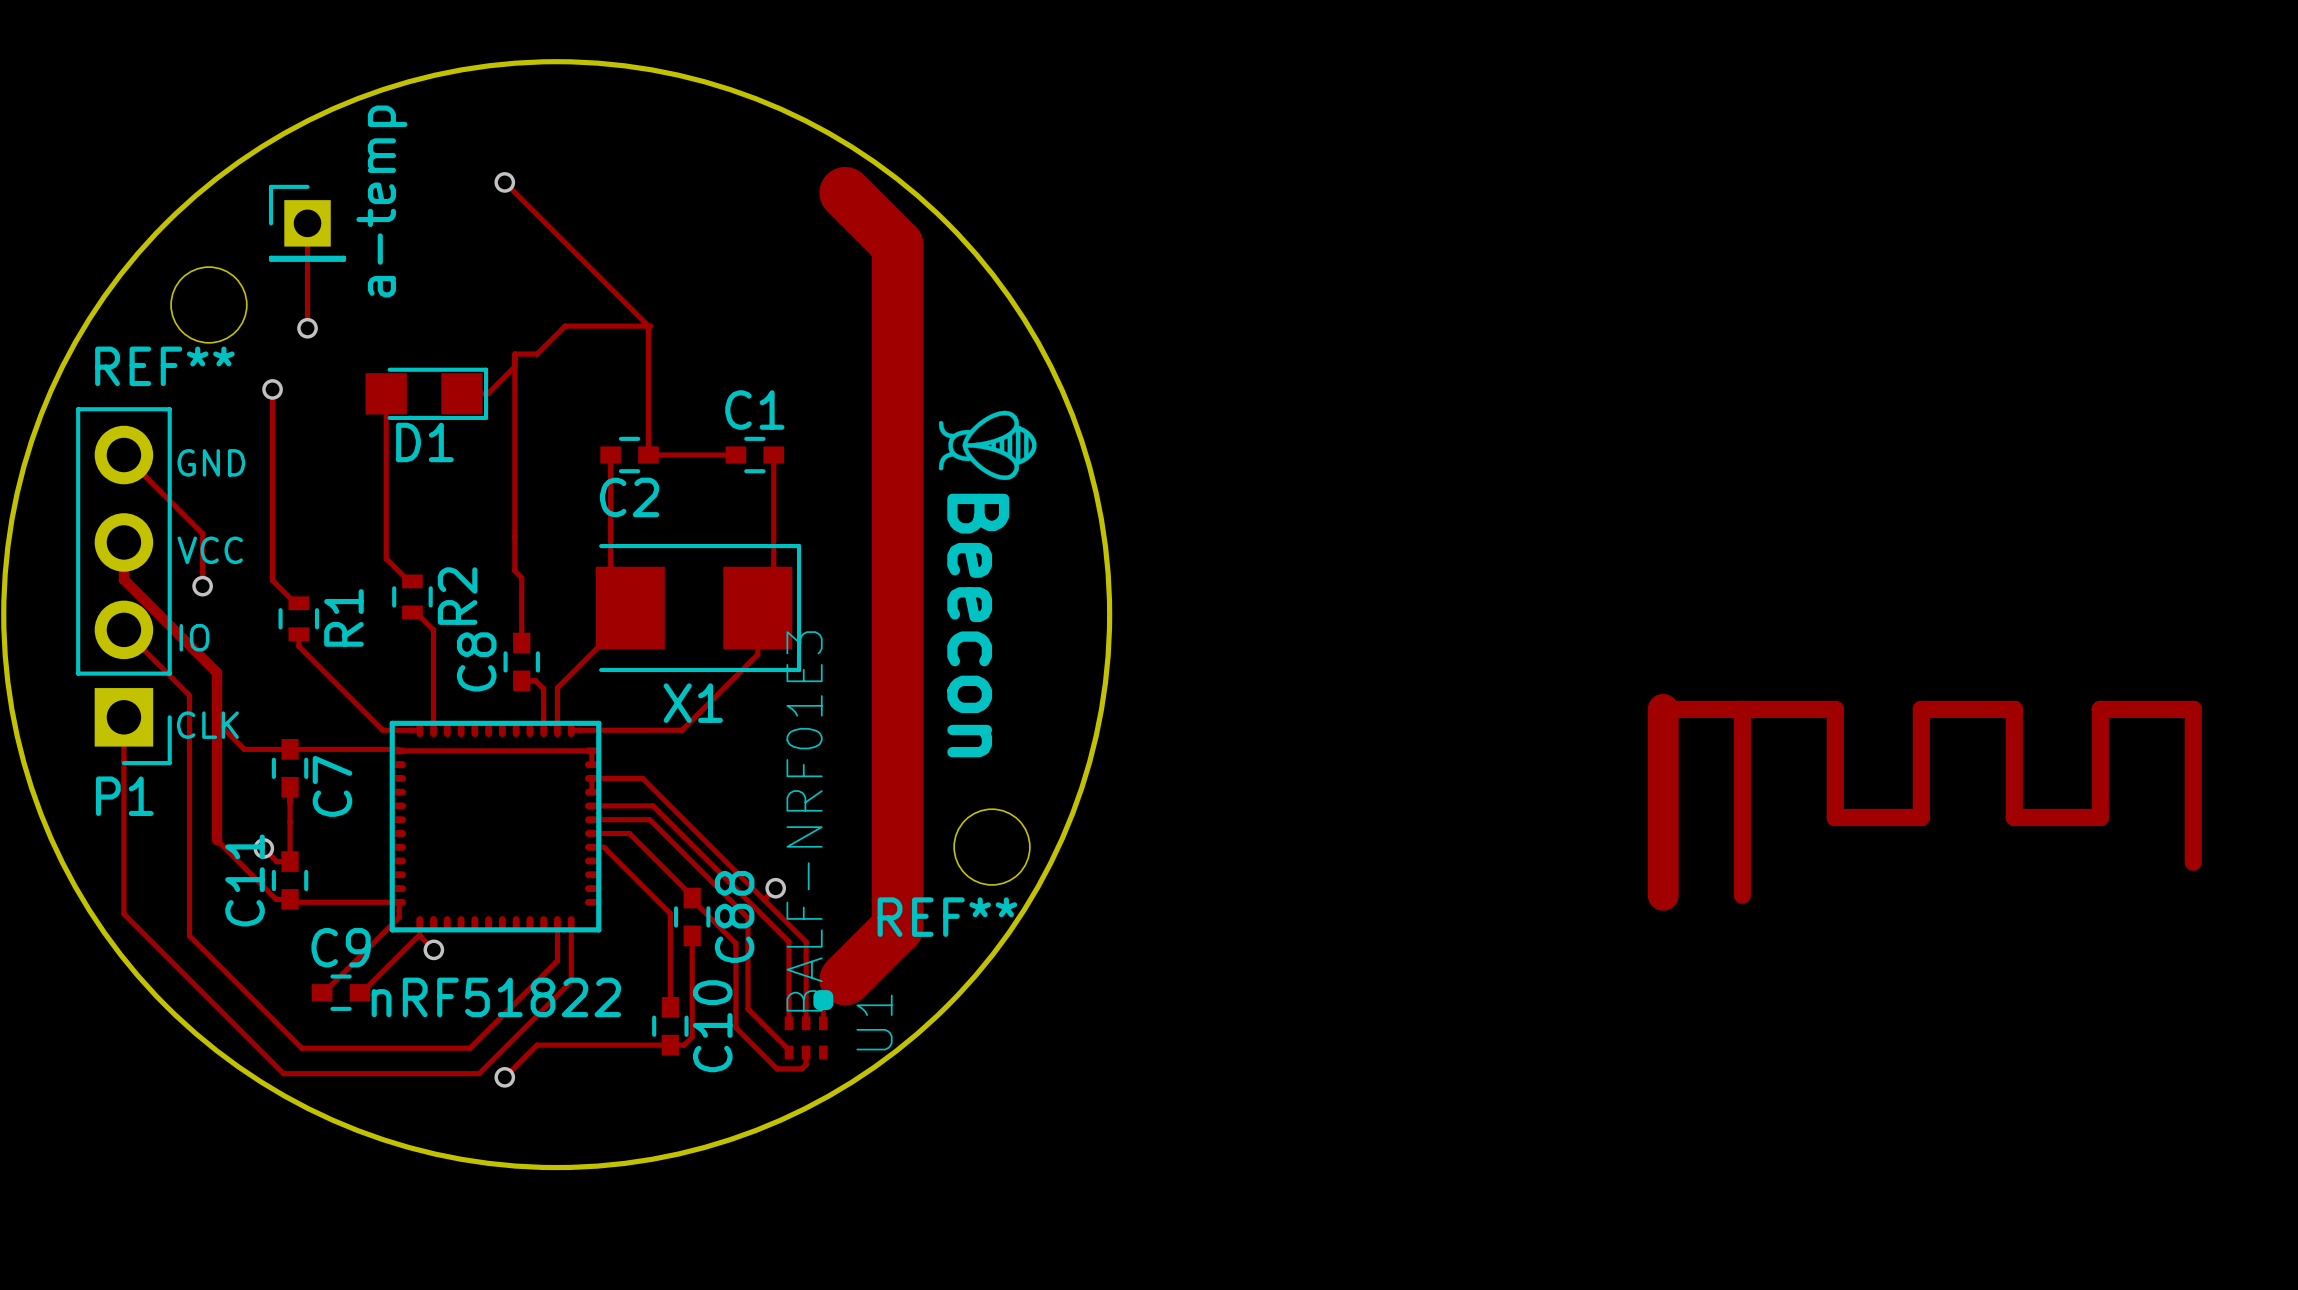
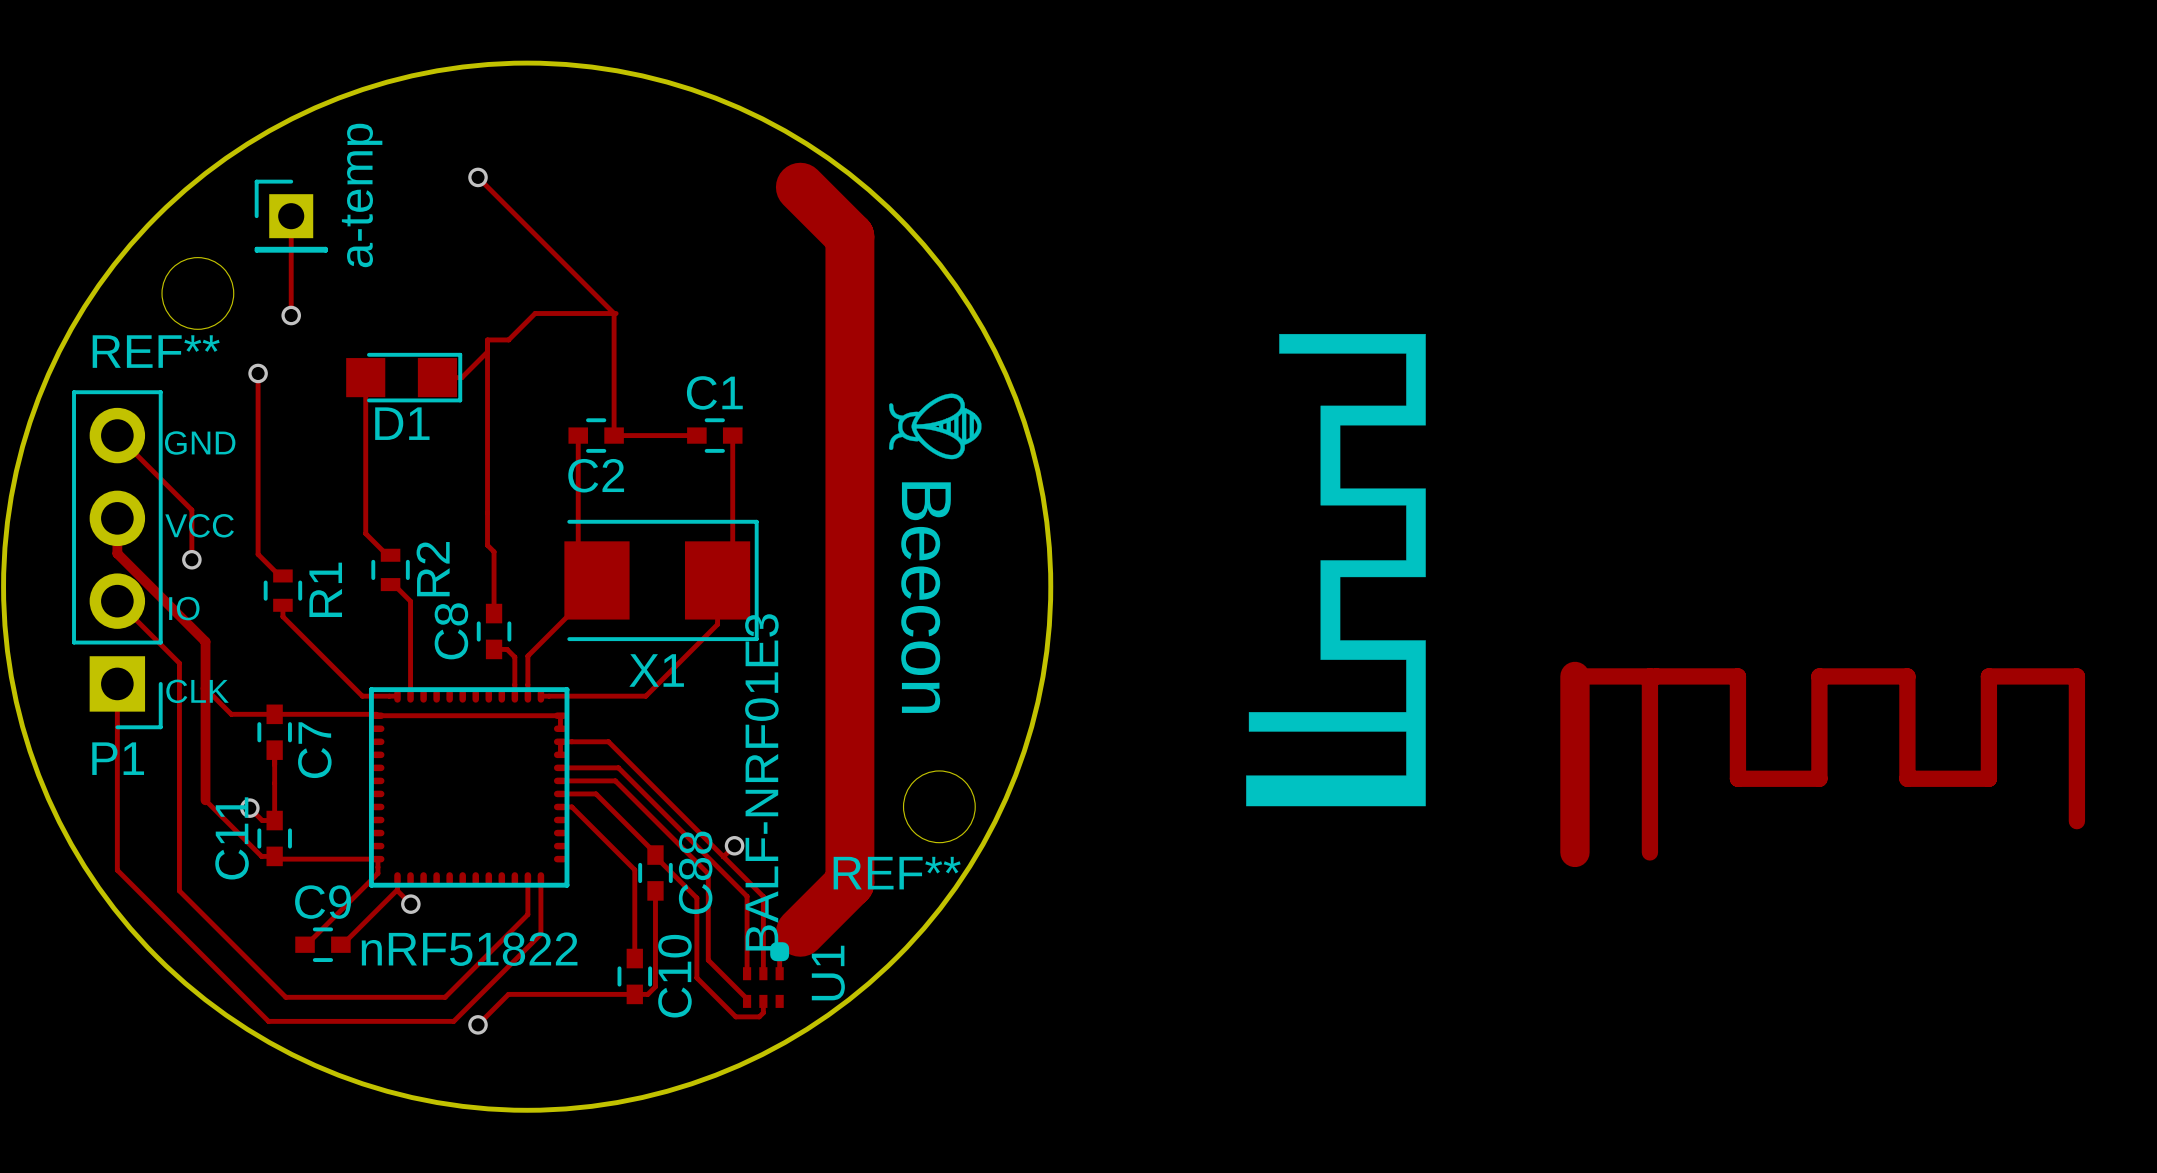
drawing: none -> [1246, 333, 1426, 807]

